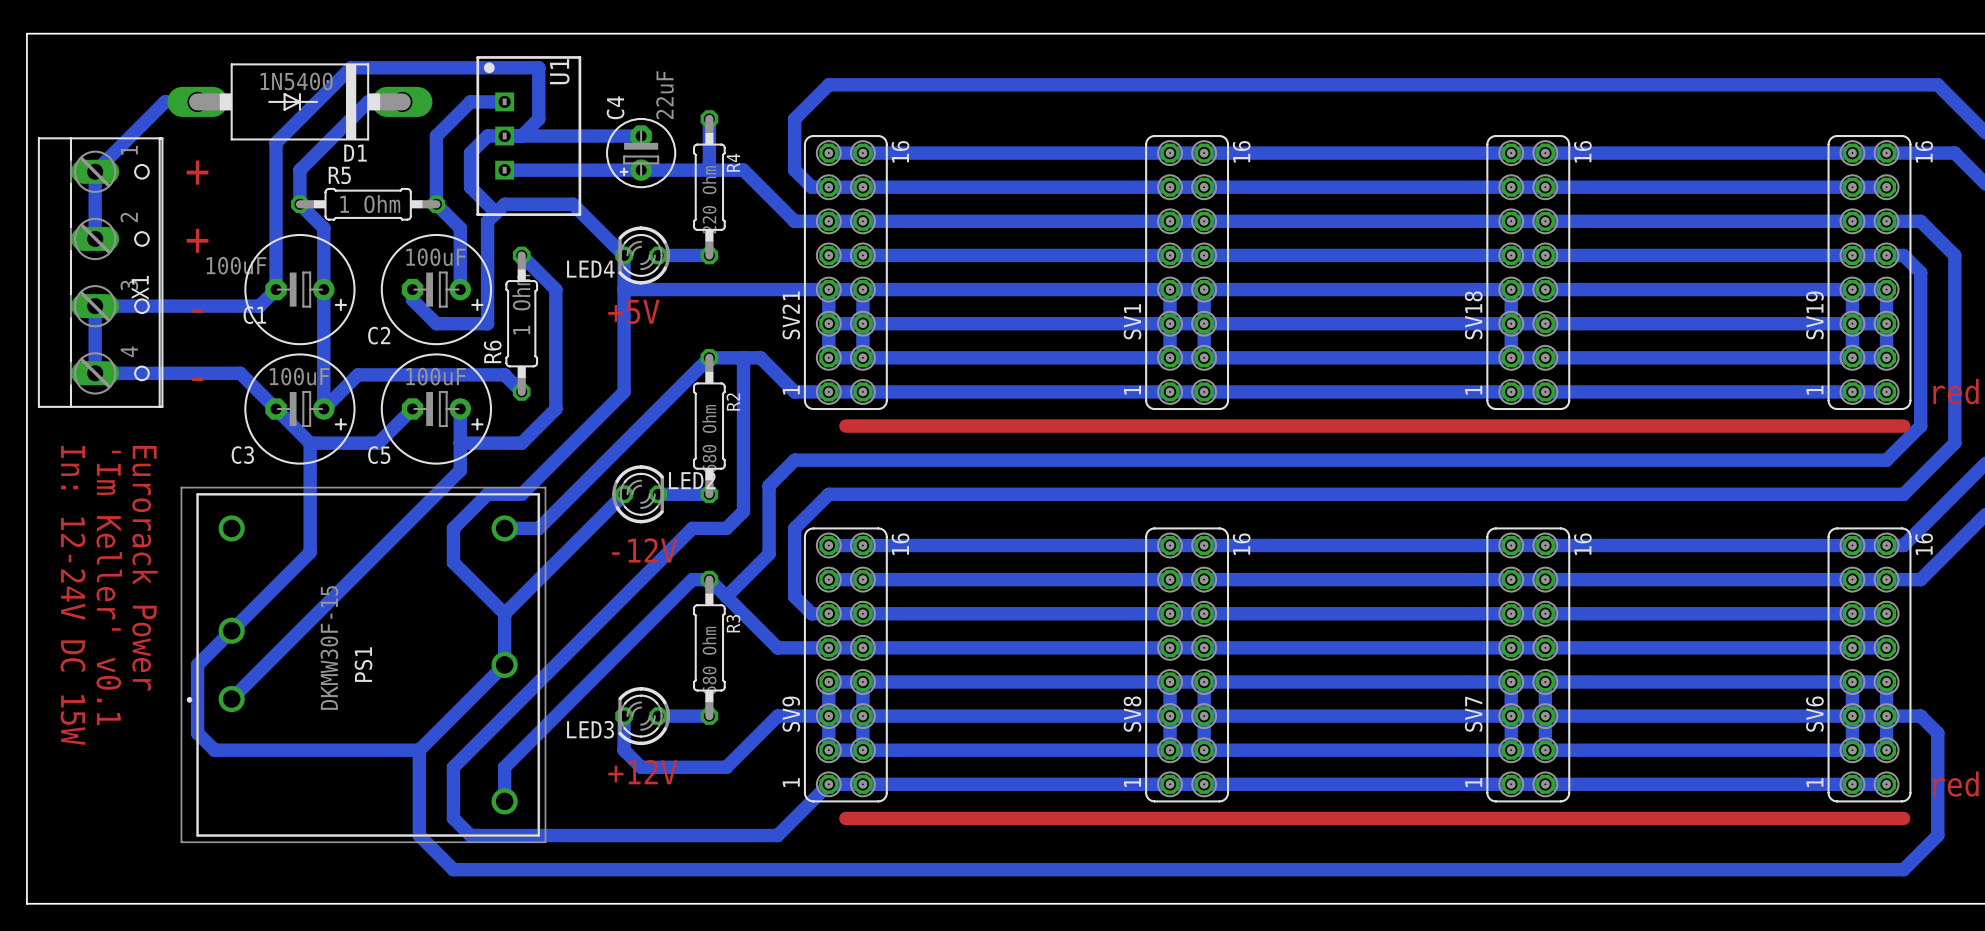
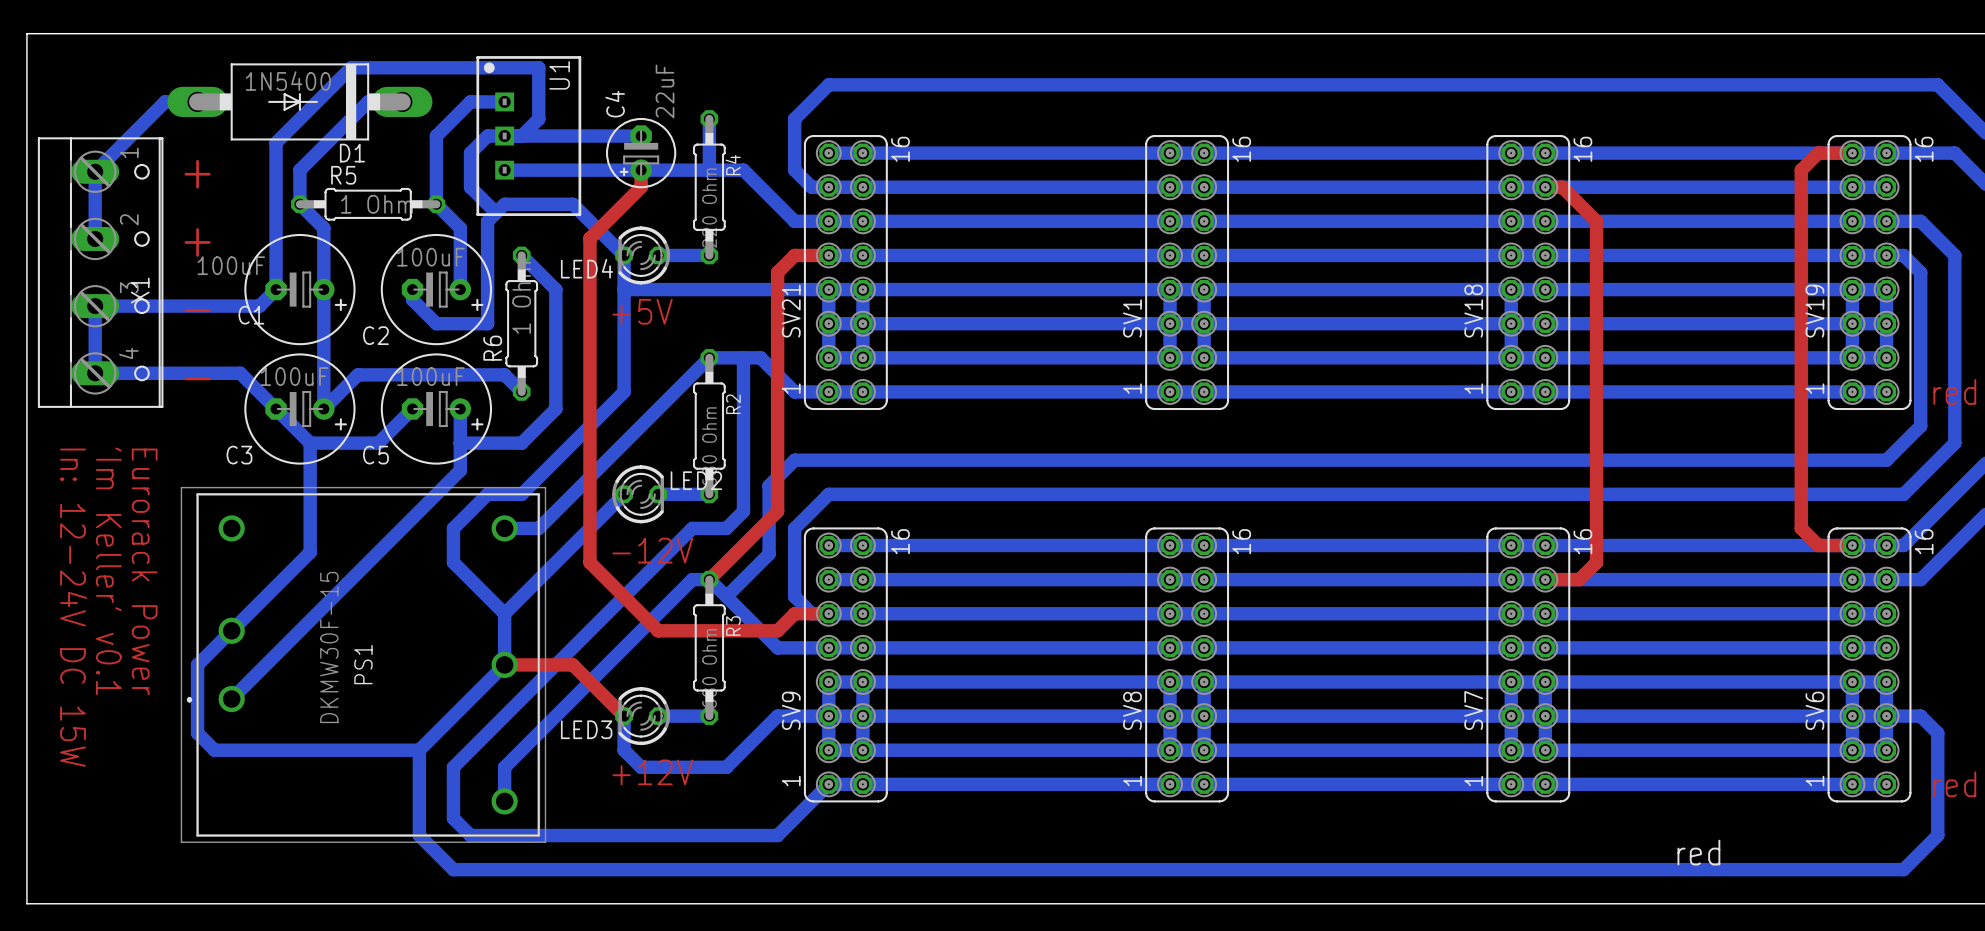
top track: none -> (1852, 153) (1818, 153) (1801, 170) (1801, 528) (1818, 545) (1852, 545)
top track: none -> (641, 170) (641, 187) (589, 238) (589, 562) (658, 630) (777, 630) (794, 613) (828, 613)
top track: none -> (1545, 187) (1562, 187) (1596, 221) (1596, 562) (1579, 579) (1545, 579)
top track: none -> (828, 255) (794, 255) (777, 272) (777, 511) (709, 579)
top track: (845, 426) (1903, 426) -> none
top track: none -> (504, 664) (572, 664) (624, 716)
top track: (845, 818) (1903, 818) -> none
text: none -> red (1698, 852)

